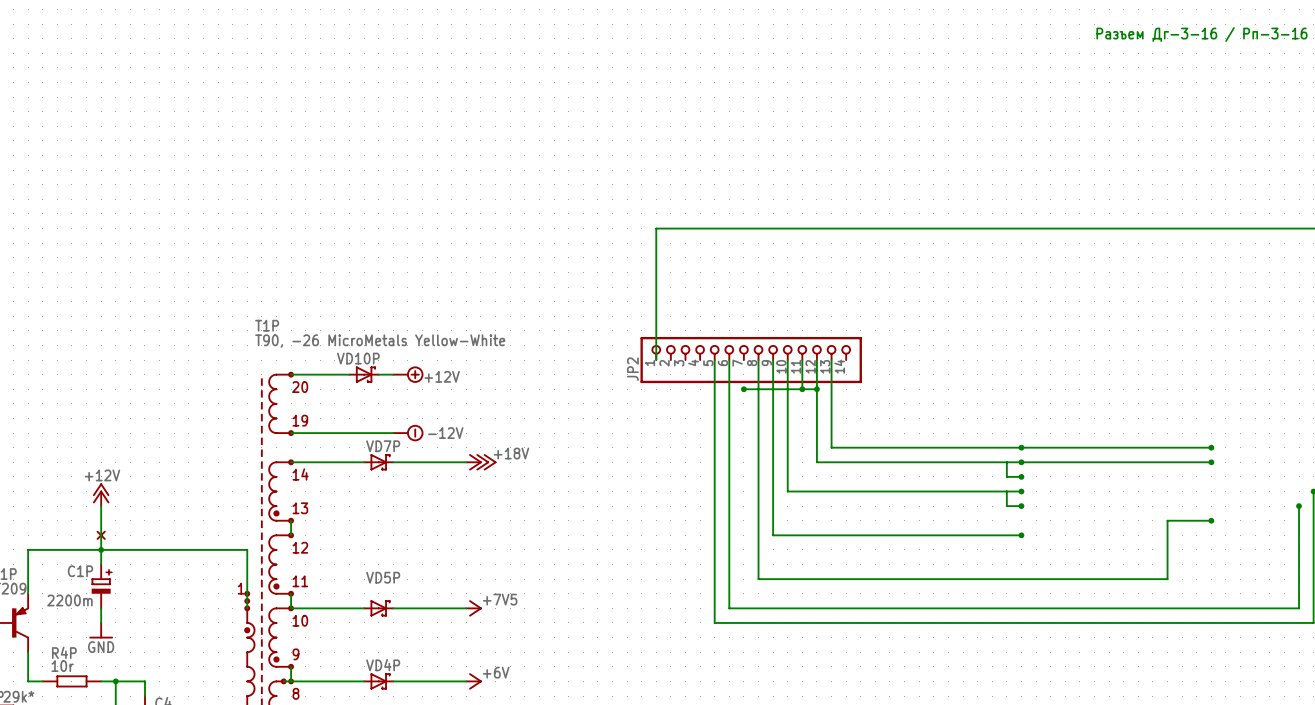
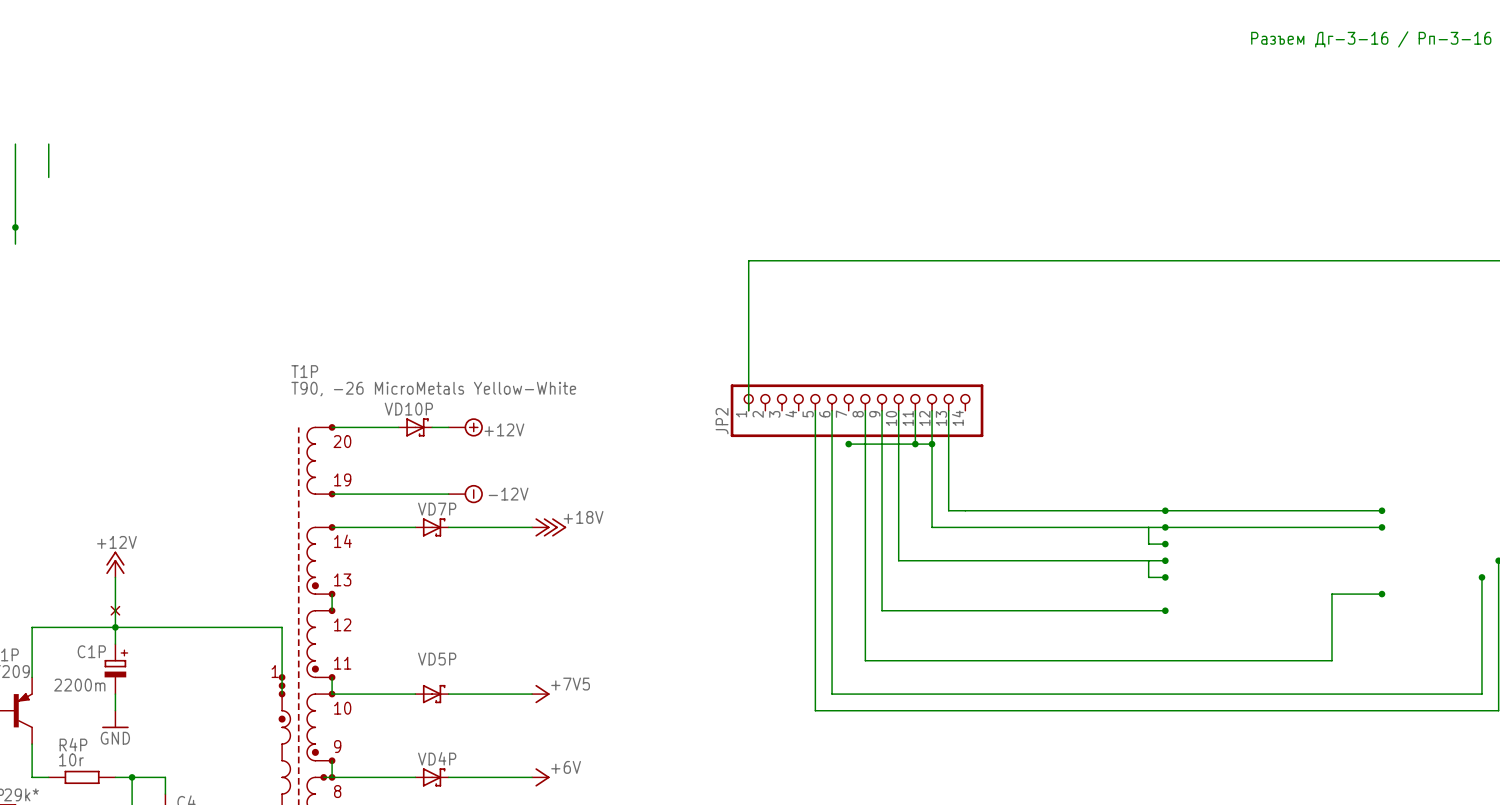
wire: none -> (15, 144) (15, 244)
wire: none -> (48, 144) (48, 177)
junction: none -> (15, 227)

